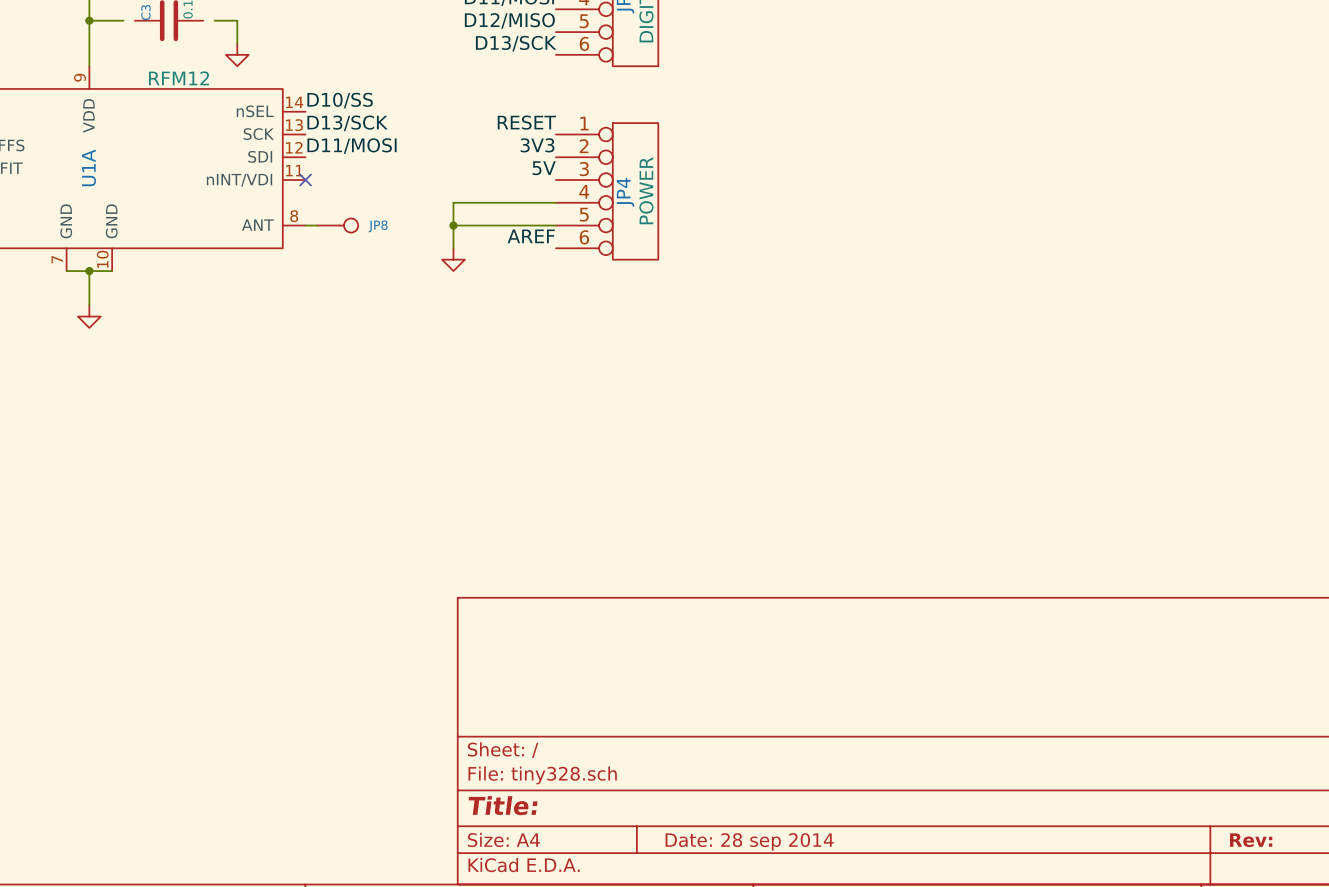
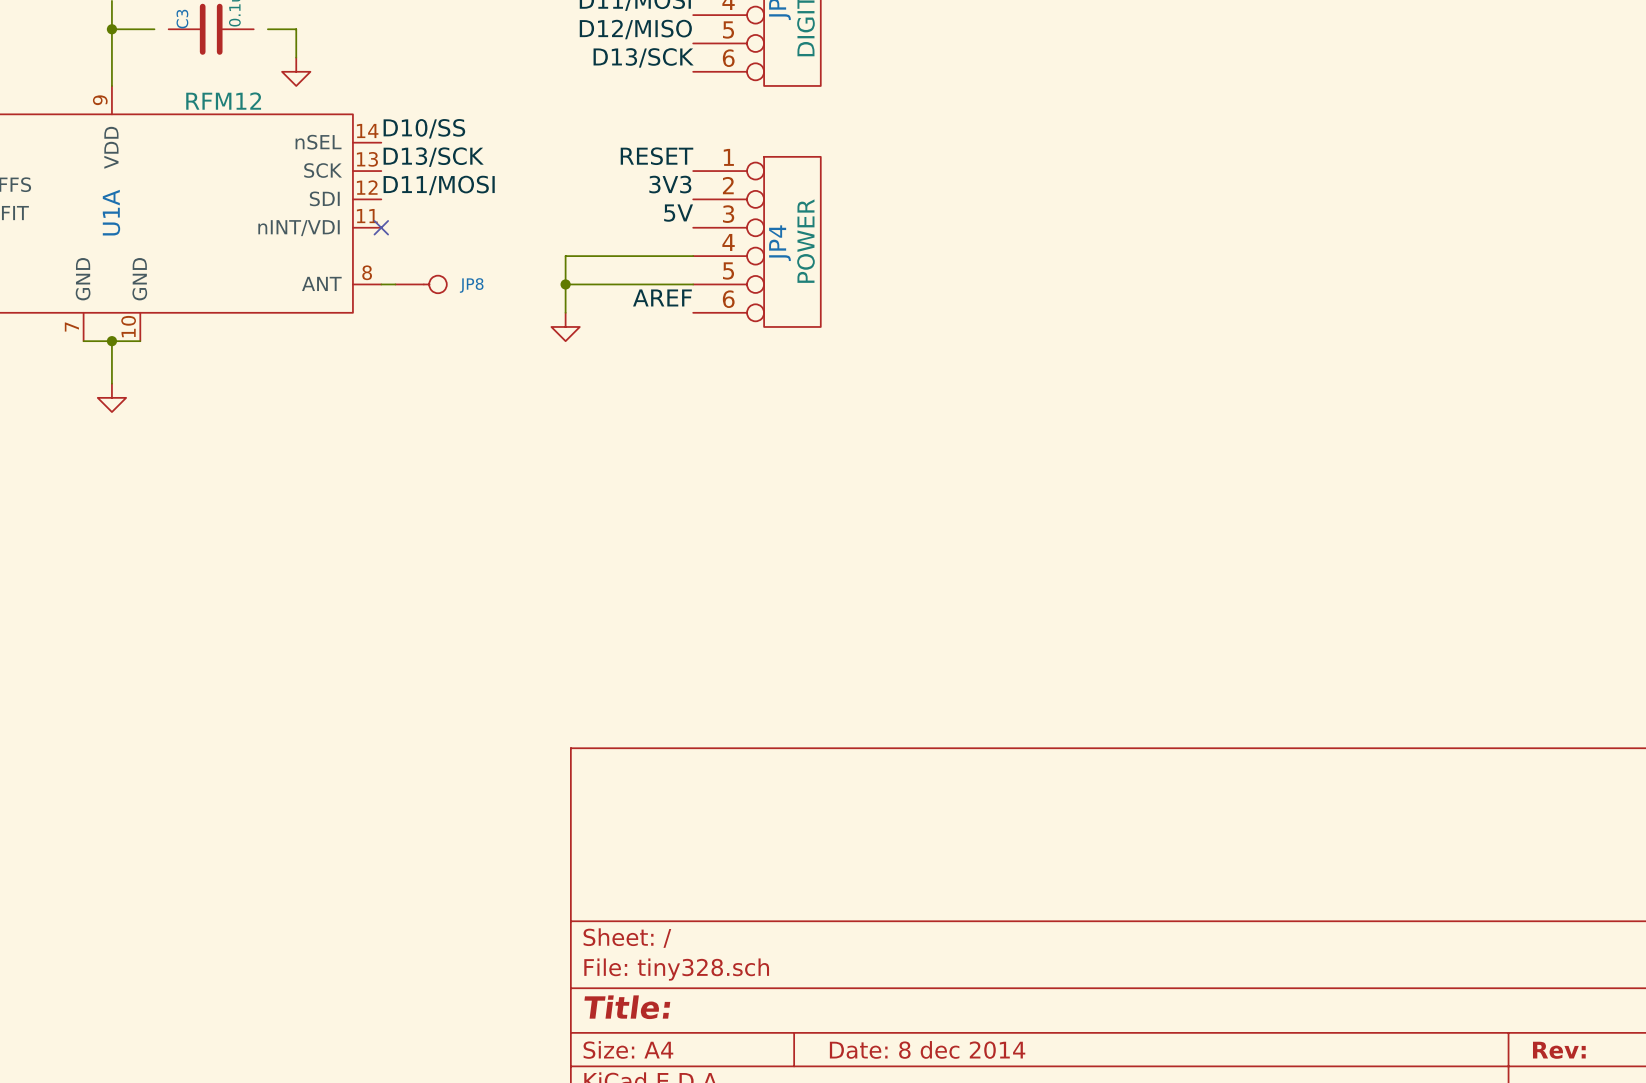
title block: Date: 28 sep 2014 (749, 841) -> Date: 8 dec 2014 (927, 1049)

